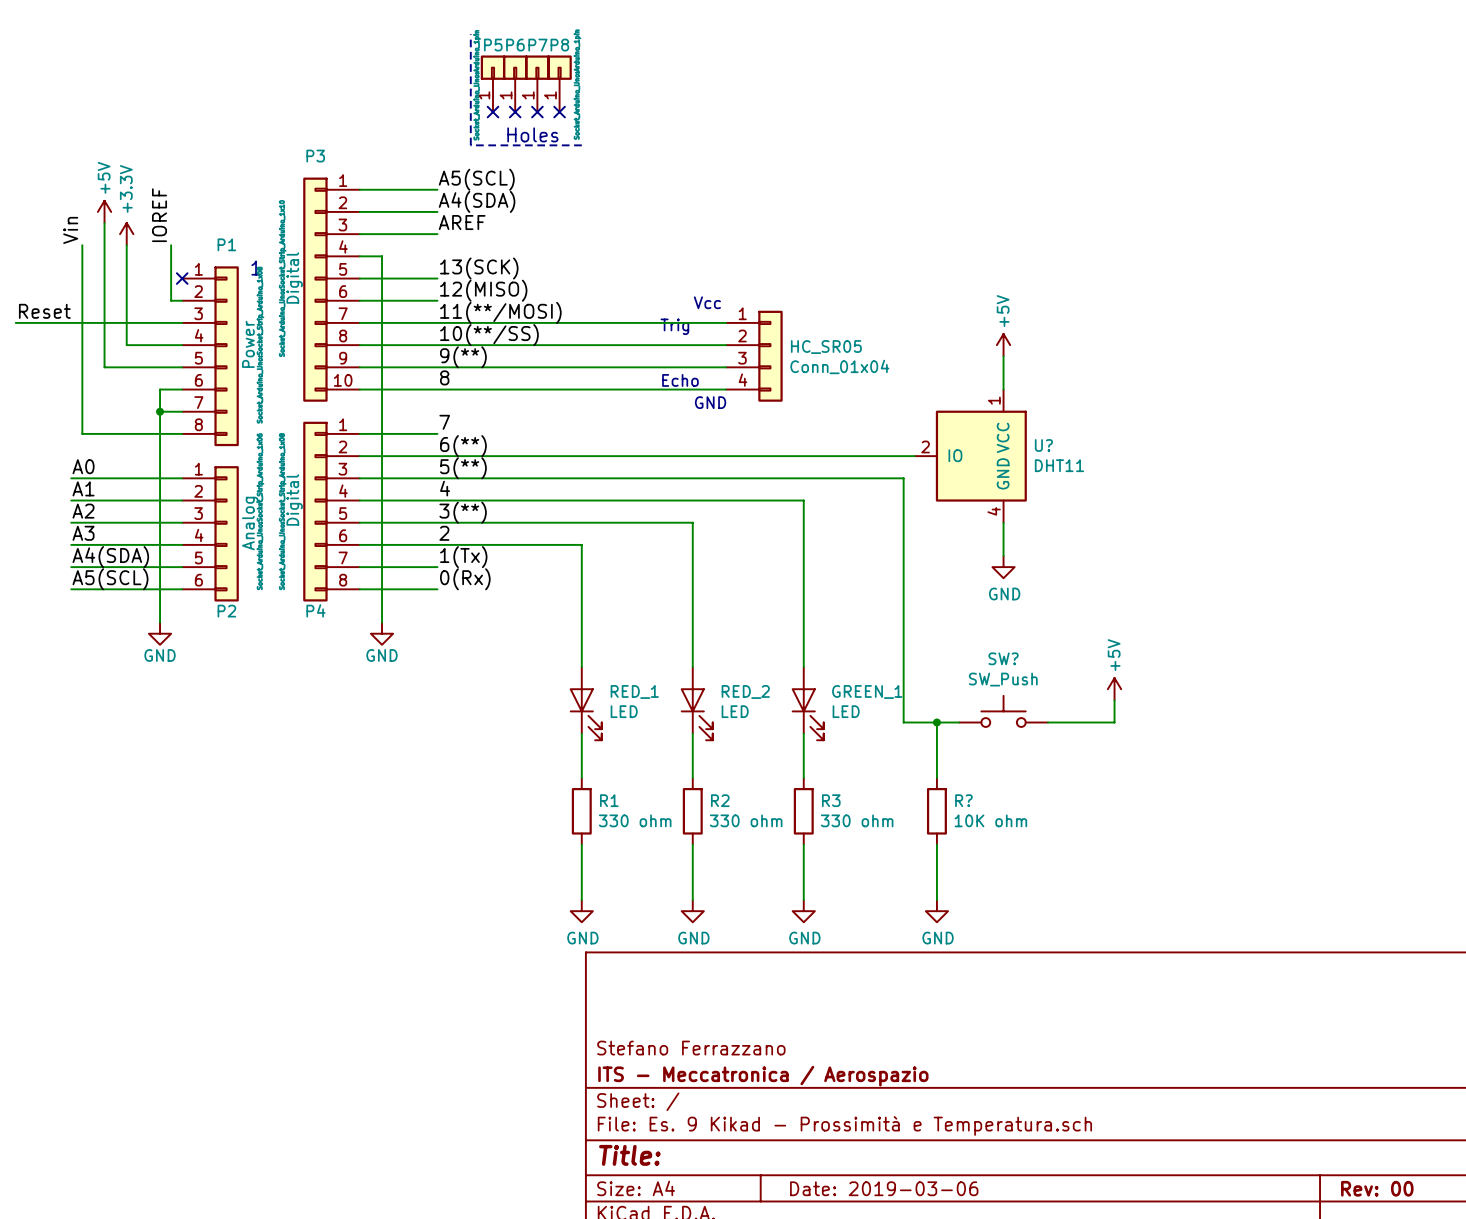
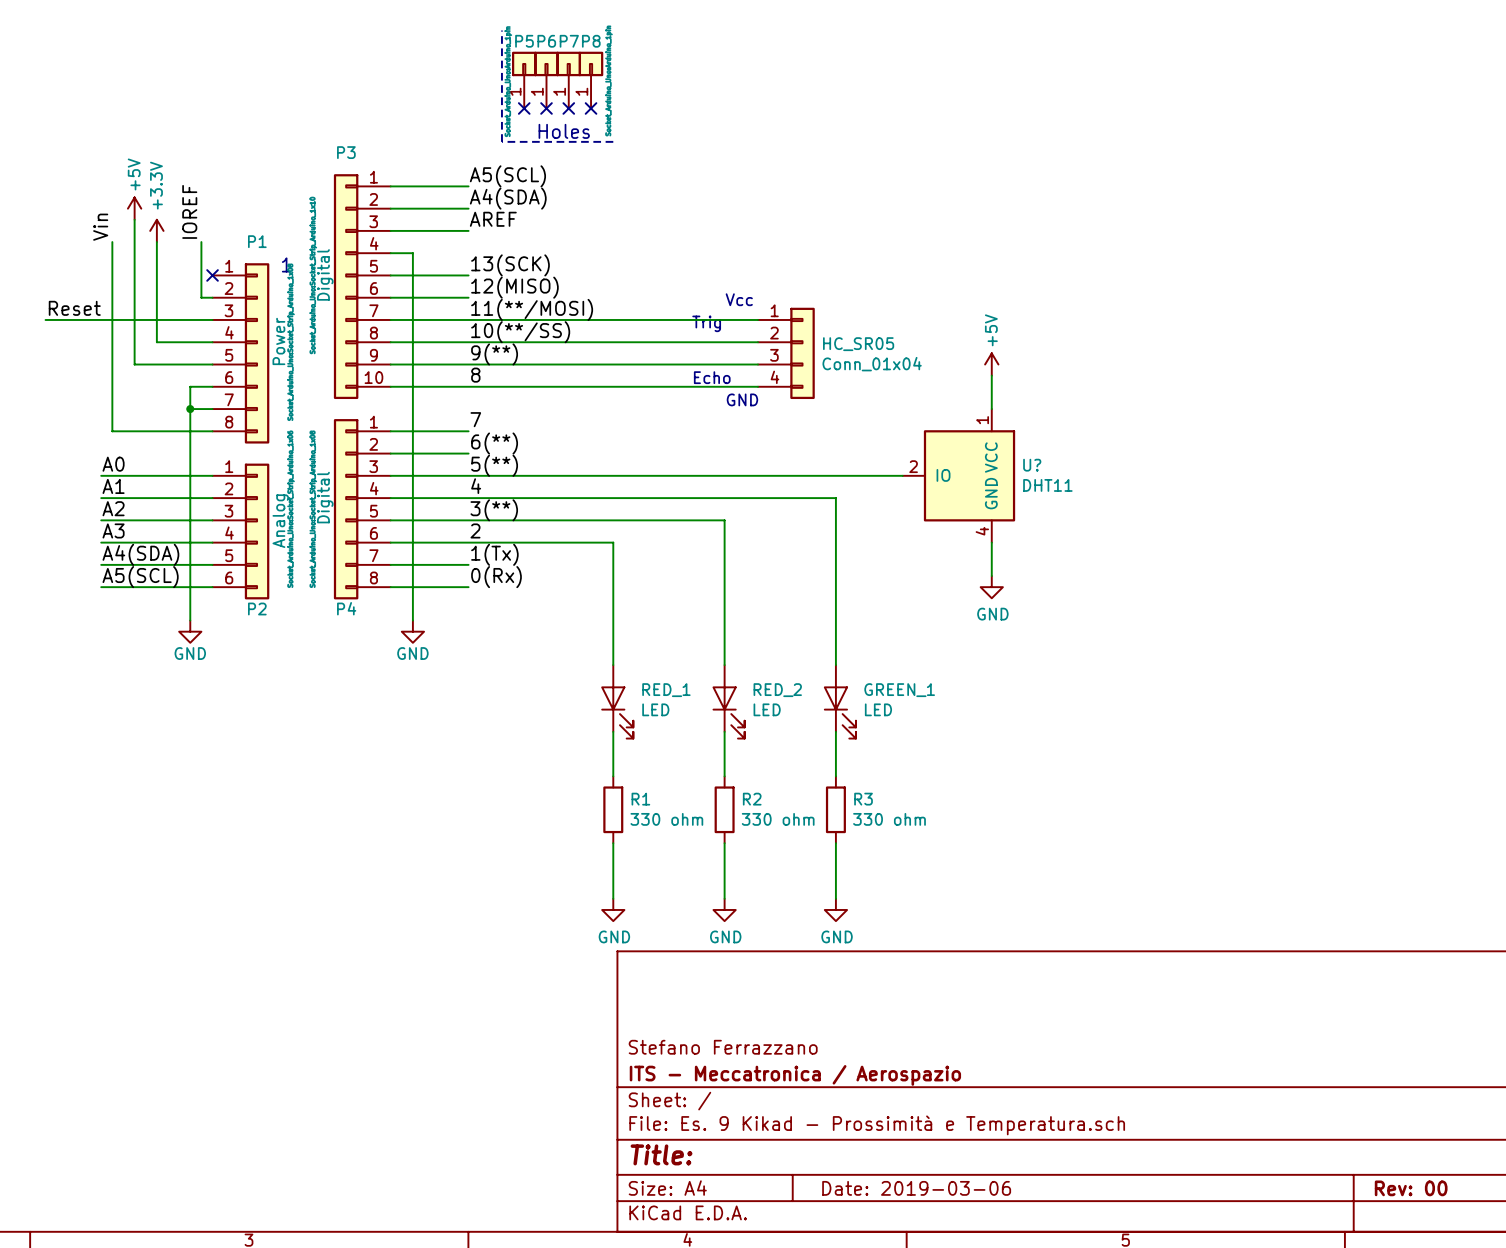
power symbol position: +5V (1003, 345) -> +5V (991, 364)
wire: (1003, 356) (1003, 389) -> (991, 375) (991, 409)
wire: (437, 456) (914, 456) -> none
U? position: (970, 456) -> (958, 475)
wire: (870, 478) (903, 478) (903, 722) (959, 722) -> none
wire: (1003, 522) (1003, 556) -> (991, 542) (991, 576)
power symbol position: GND (1003, 567) -> GND (991, 587)
power symbol: +5V (1114, 689) -> none
wire: (1114, 700) (1114, 722) (1047, 722) -> none
SW?: SW_Push (1003, 711) -> none
wire: (936, 722) (936, 778) -> none
junction: (936, 722) -> none
R?: 10K ohm (936, 811) -> none
wire: (936, 844) (936, 900) -> none
power symbol: GND (936, 911) -> none

